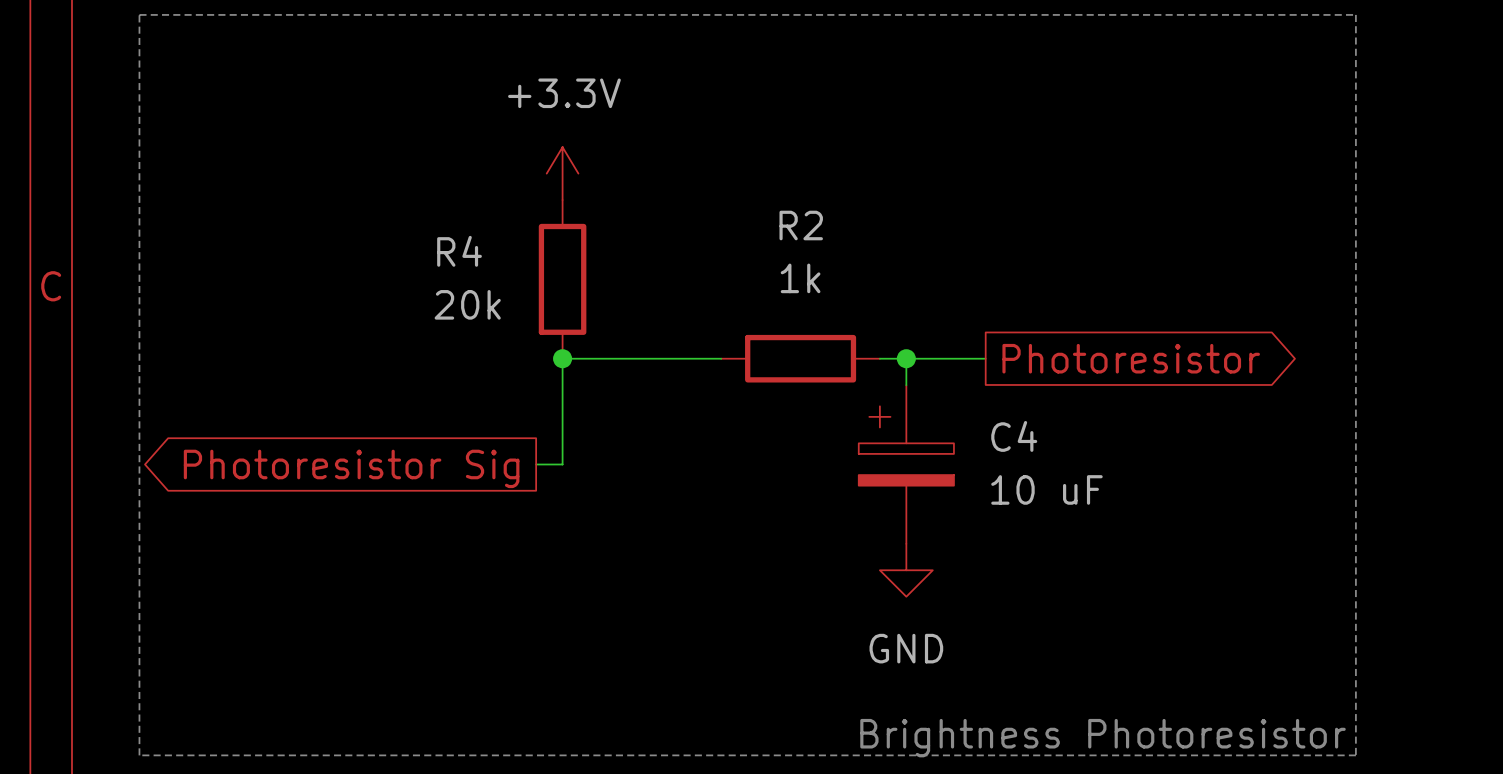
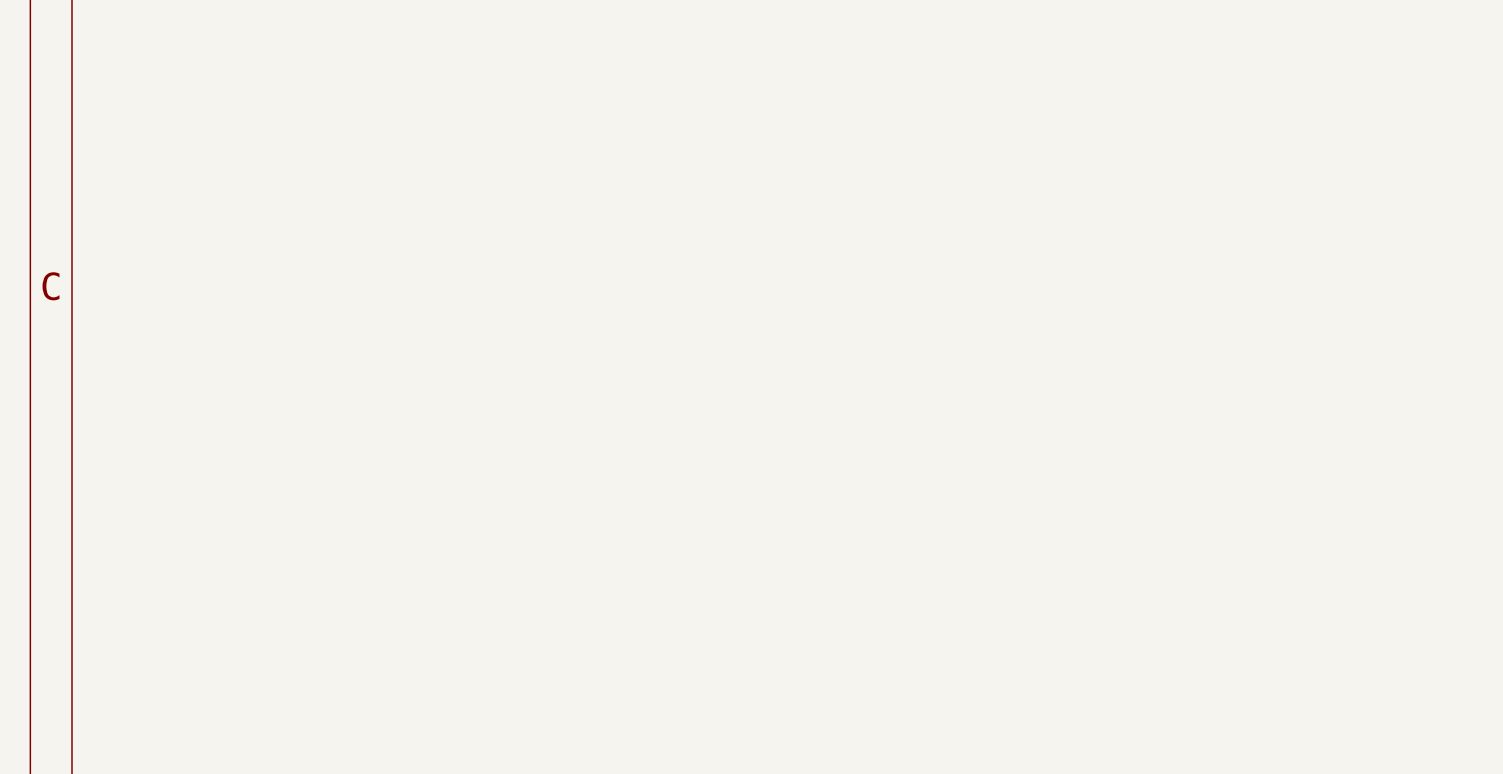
line: (139, 14) (1355, 14) (1355, 755) (139, 755) (139, 14) -> none
power symbol: +3.3V (562, 173) -> none
R4: 20k (562, 279) -> none
junction: (562, 358) -> none
wire: (721, 358) (562, 358) (562, 464) (536, 464) -> none
R2: 1k (800, 358) -> none
wire: (879, 358) (985, 358) -> none
wire: (906, 358) (906, 385) -> none
junction: (906, 358) -> none
global label: Photoresistor (1131, 358) -> none
C4: 10 uF (906, 464) -> none
global label: Photoresistor Sig (351, 468) -> none
power symbol: GND (906, 570) -> none
text: Brightness Photoresistor (1103, 738) -> none

